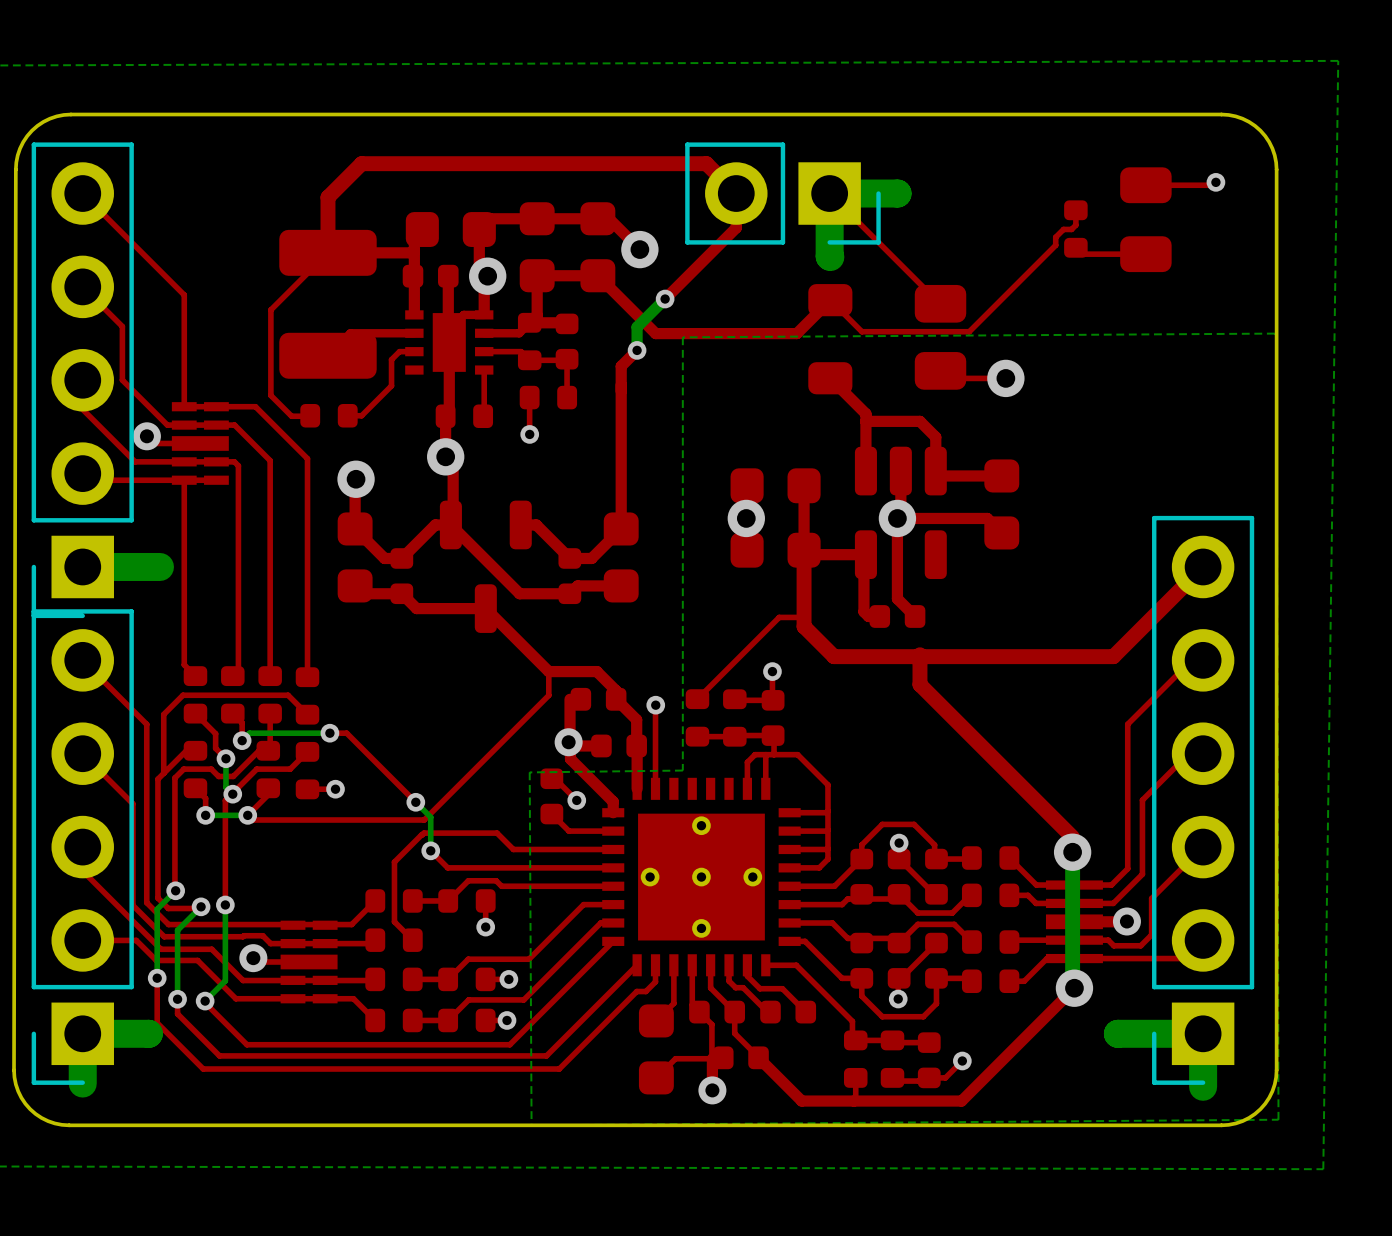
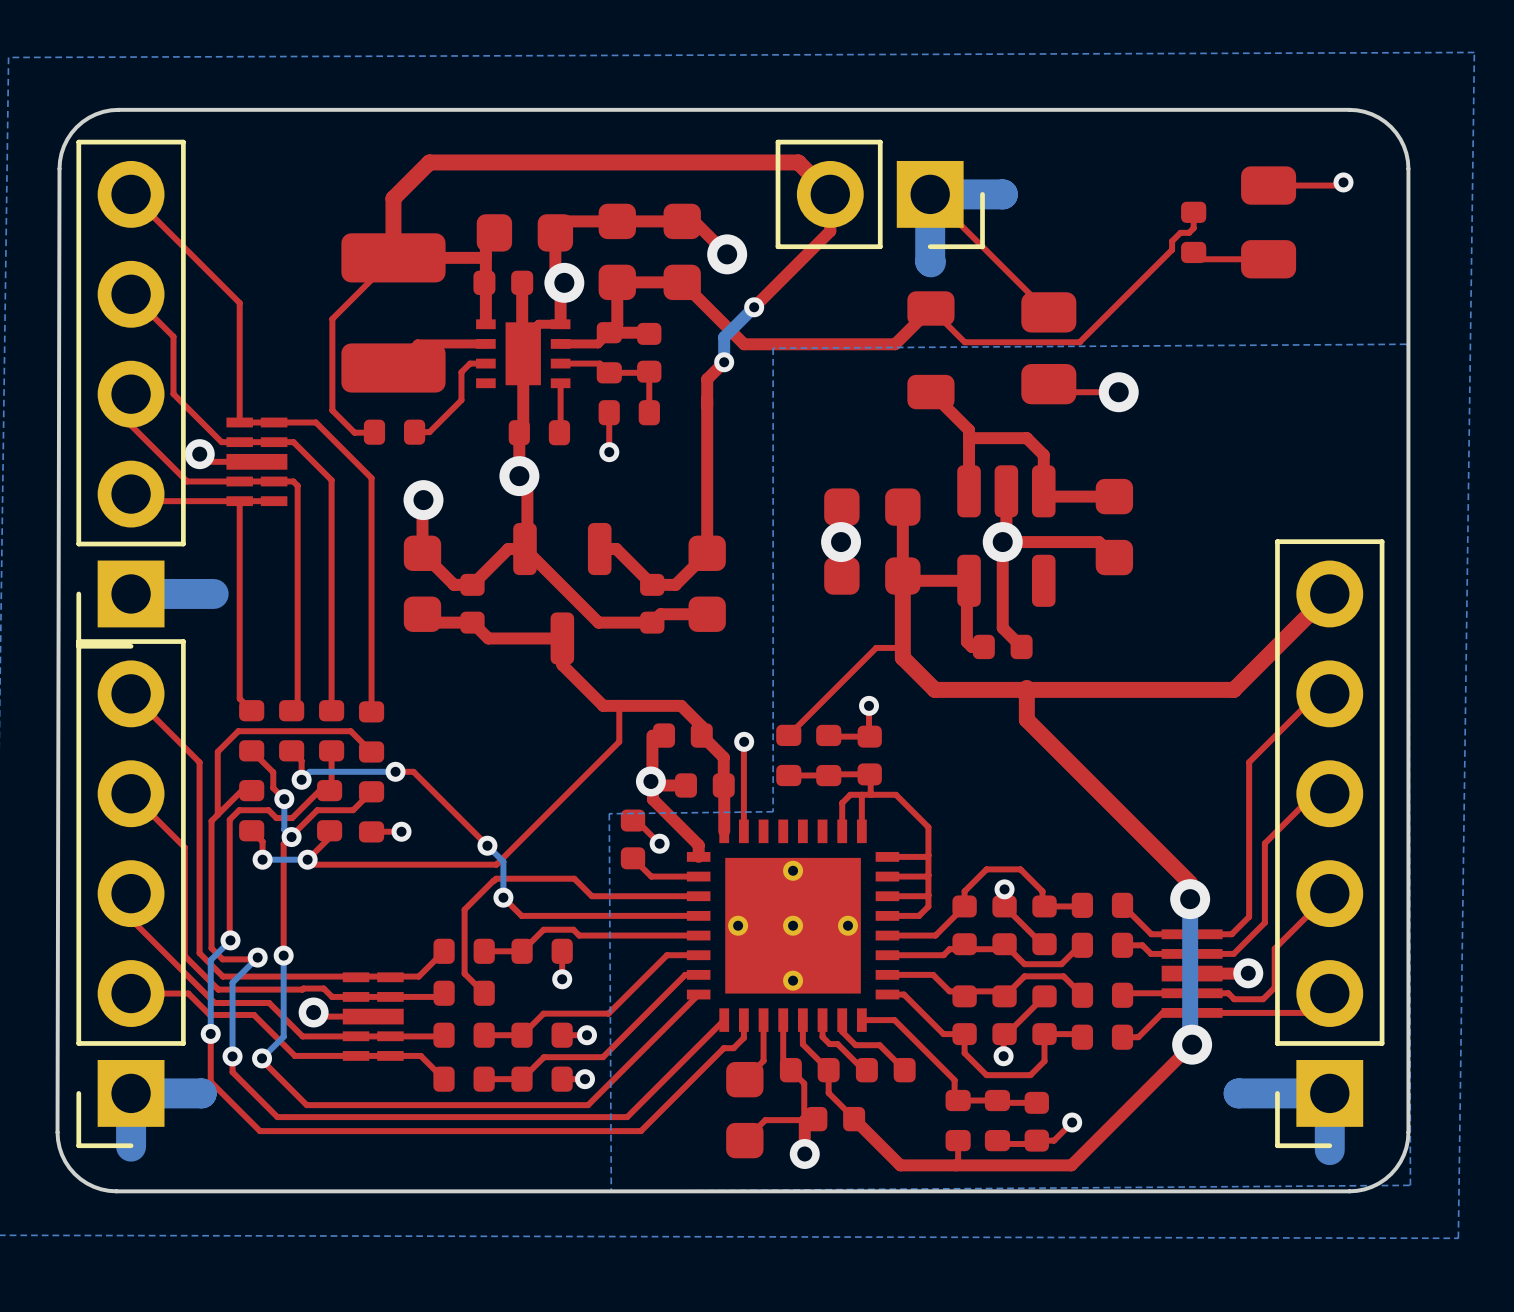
top track: (485, 608) (548, 671) (548, 695) (539, 705) -> (562, 638) (562, 664) (603, 705) (629, 705)
top track: none -> (619, 705) (619, 741)

